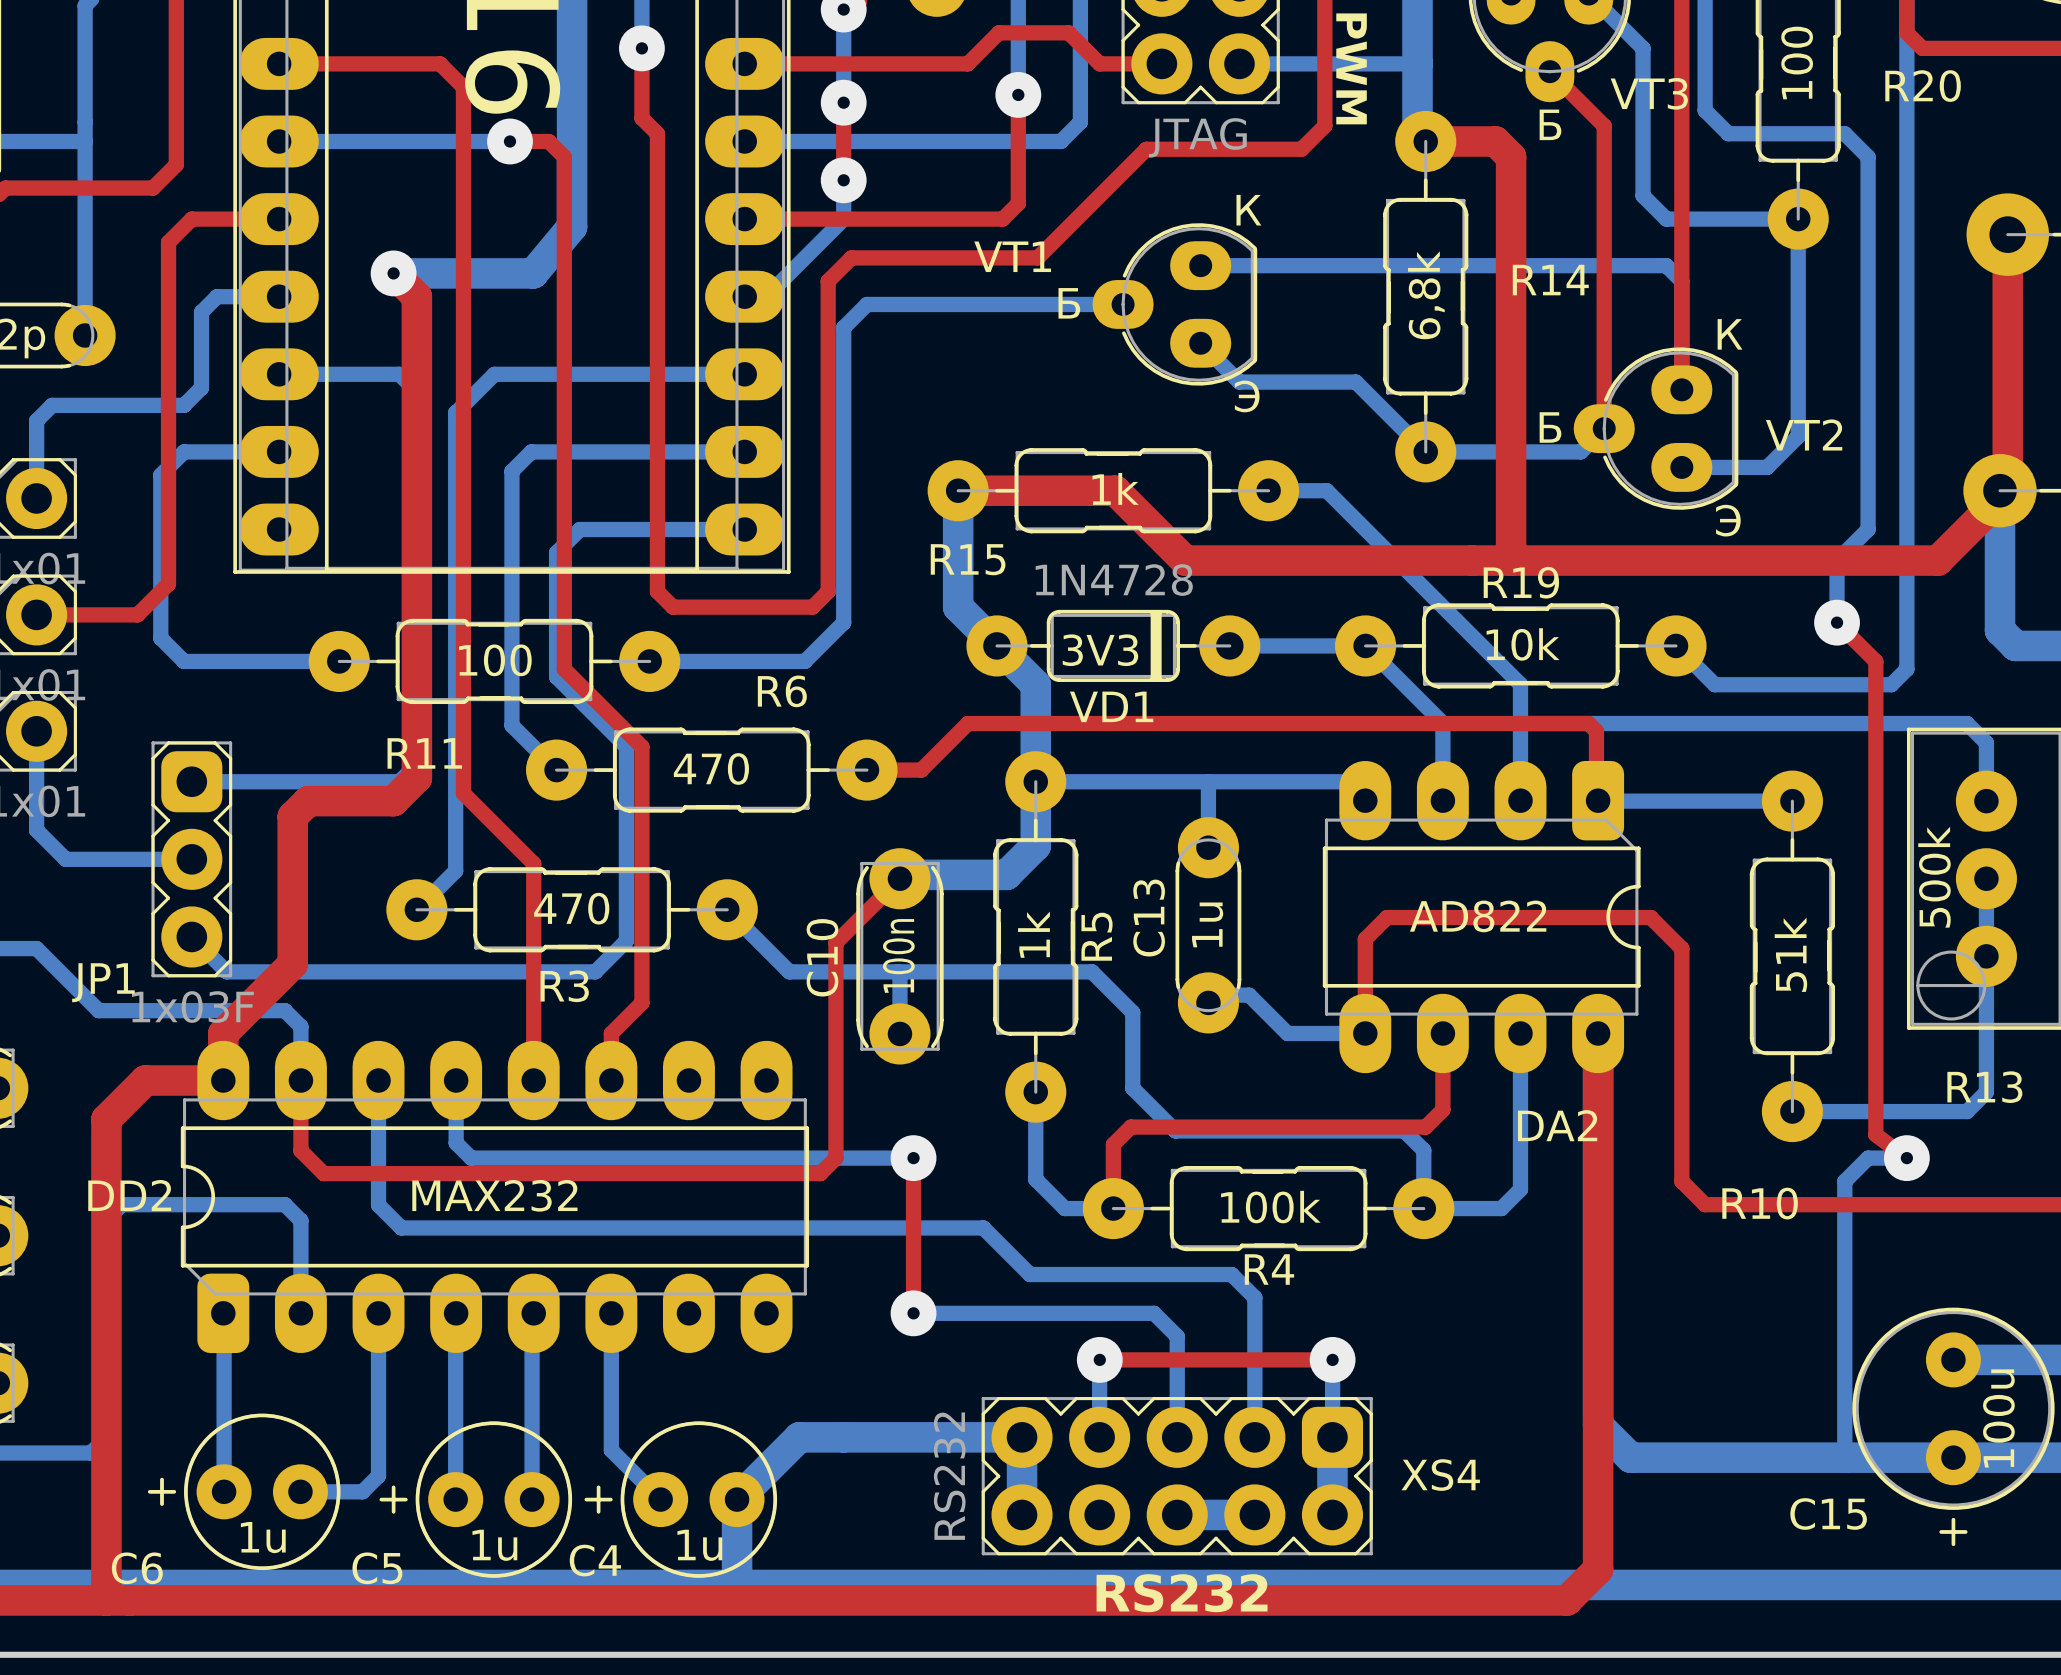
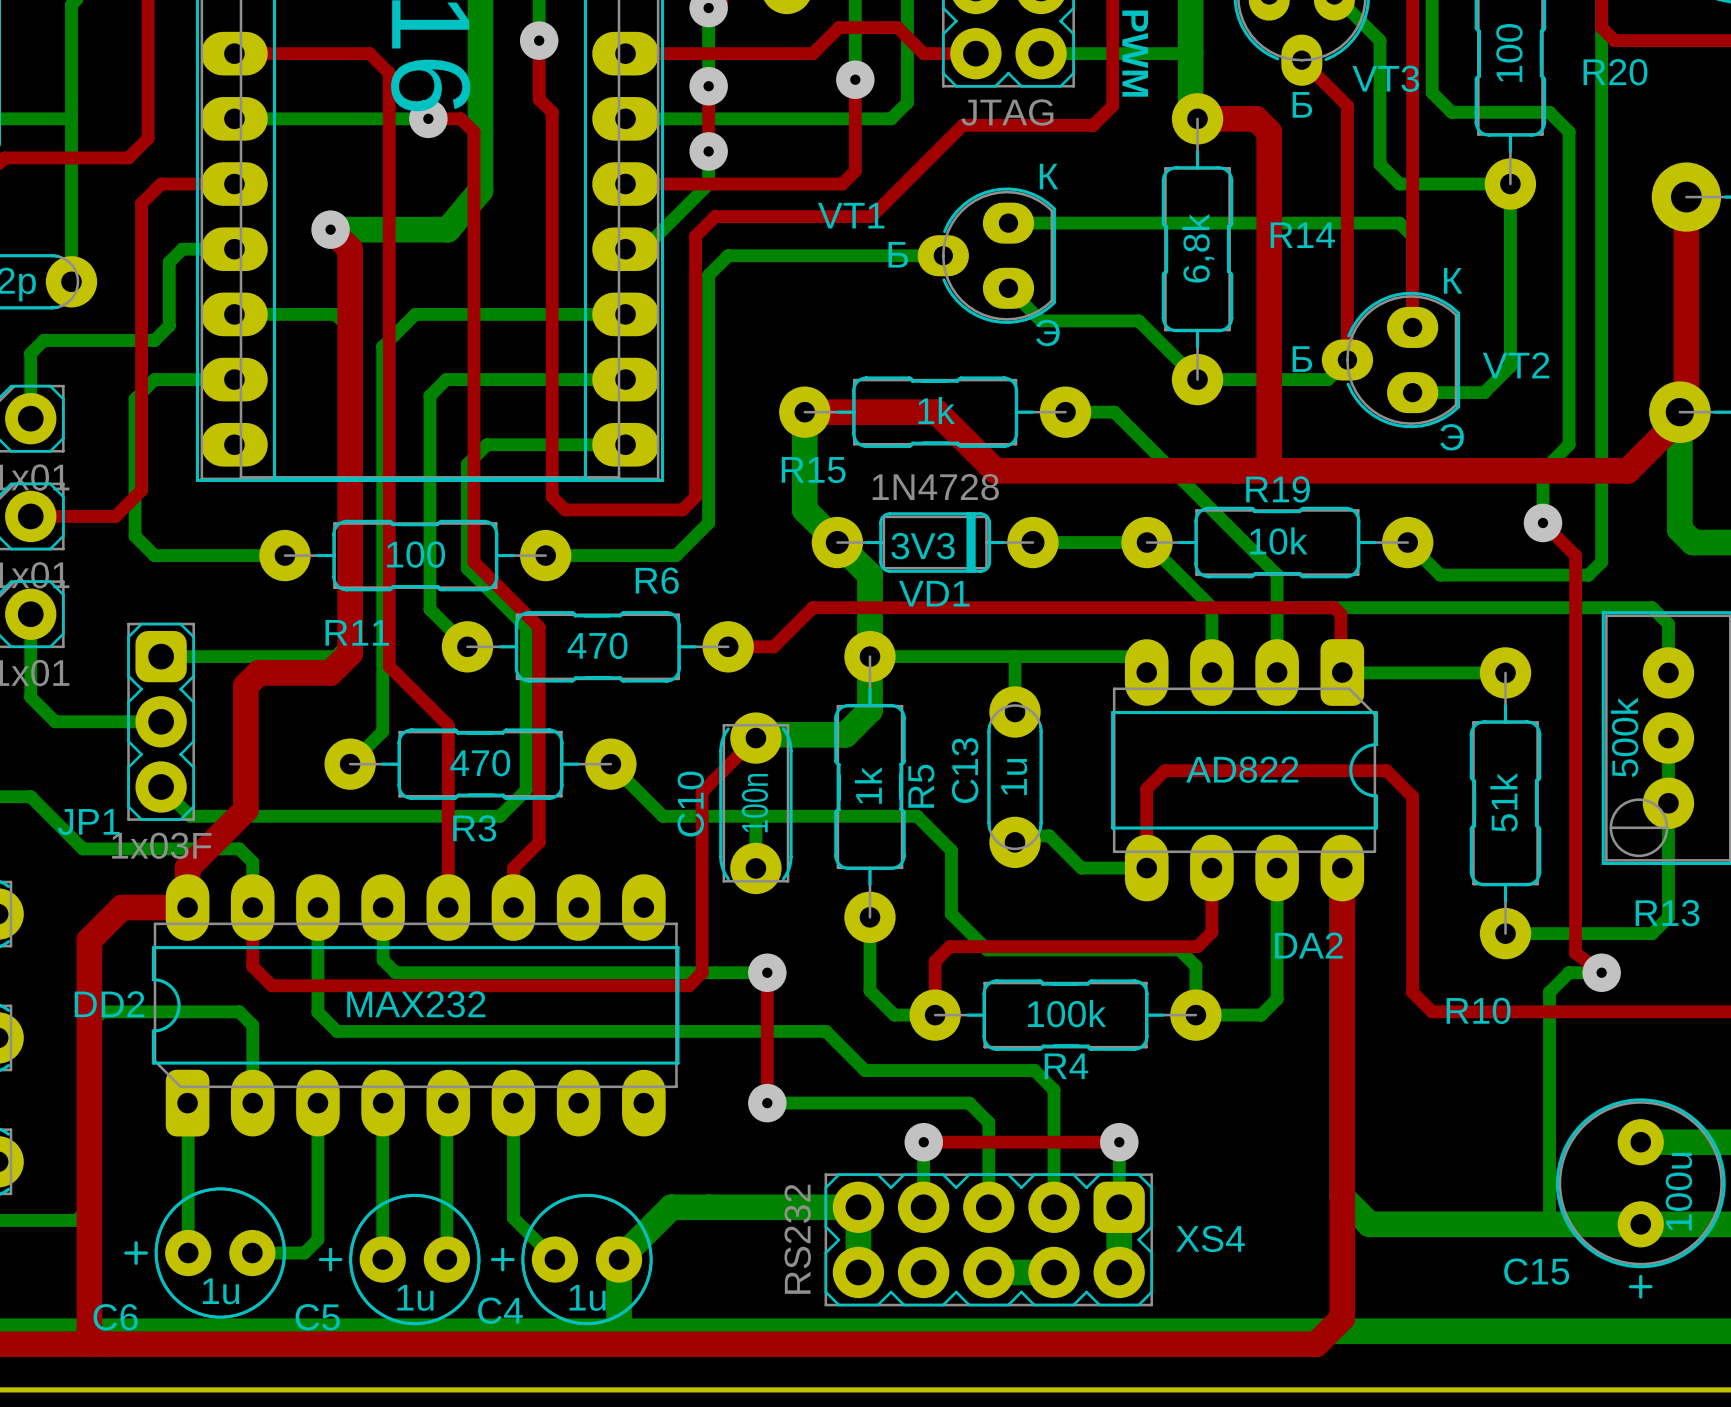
text: RS232 (1182, 1593) -> none

